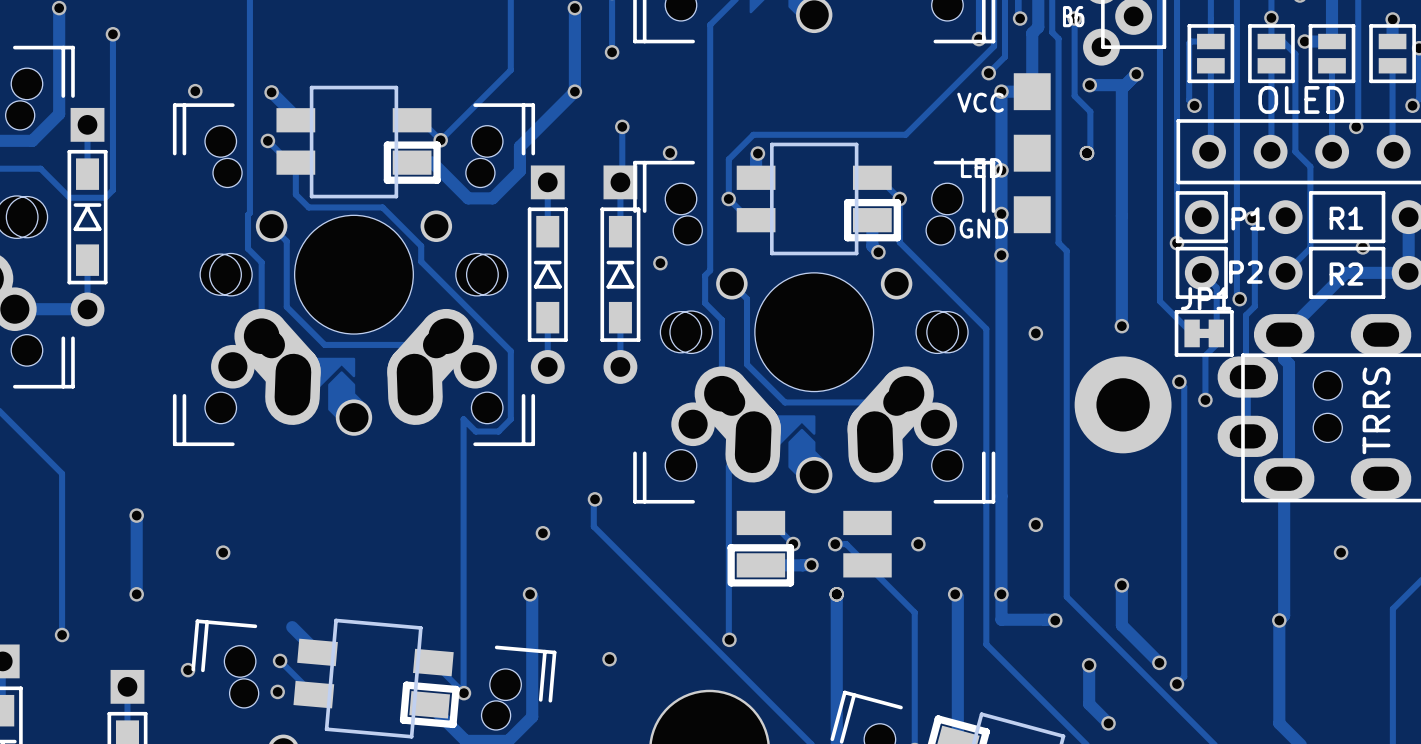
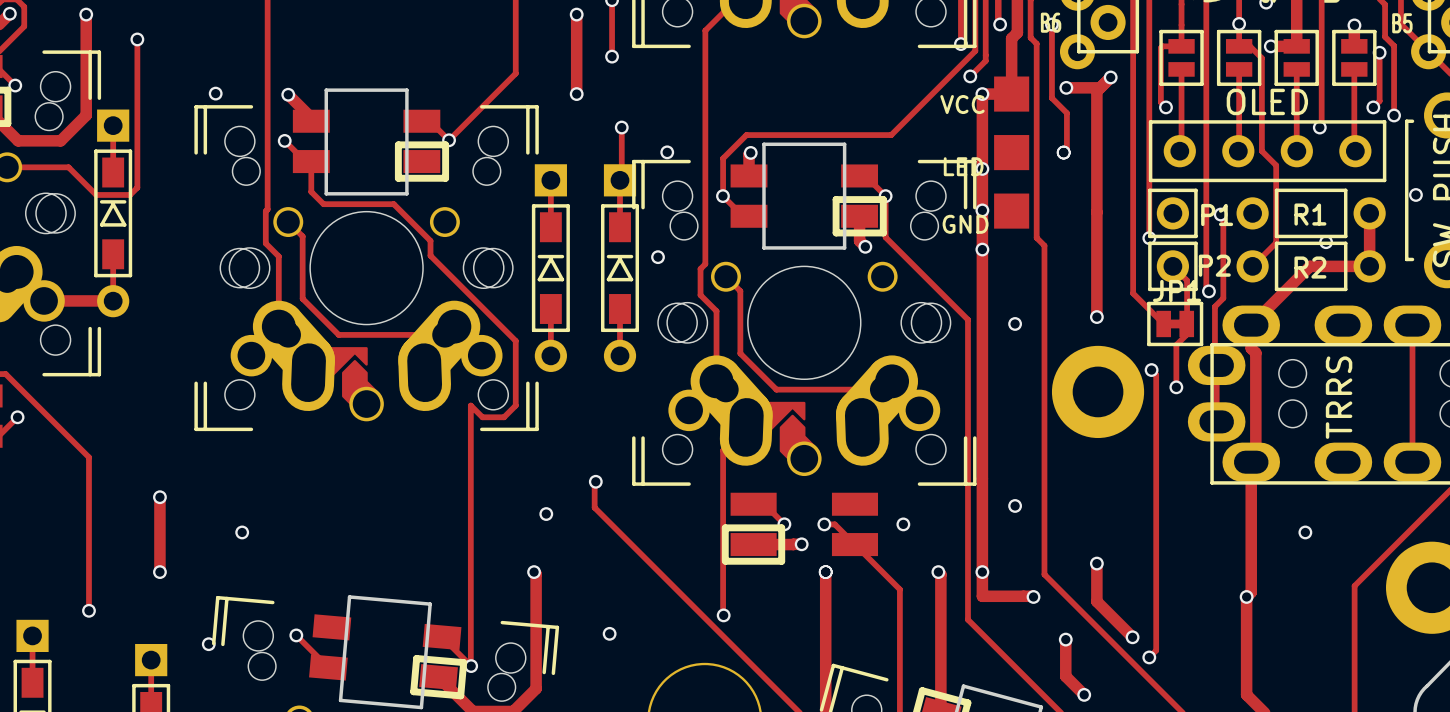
track: (574, 91) (519, 146) (519, 171) (492, 198) (468, 198) (432, 162) (412, 162) -> none
track: (292, 627) (317, 652) -> none
via: (277, 691) -> none

